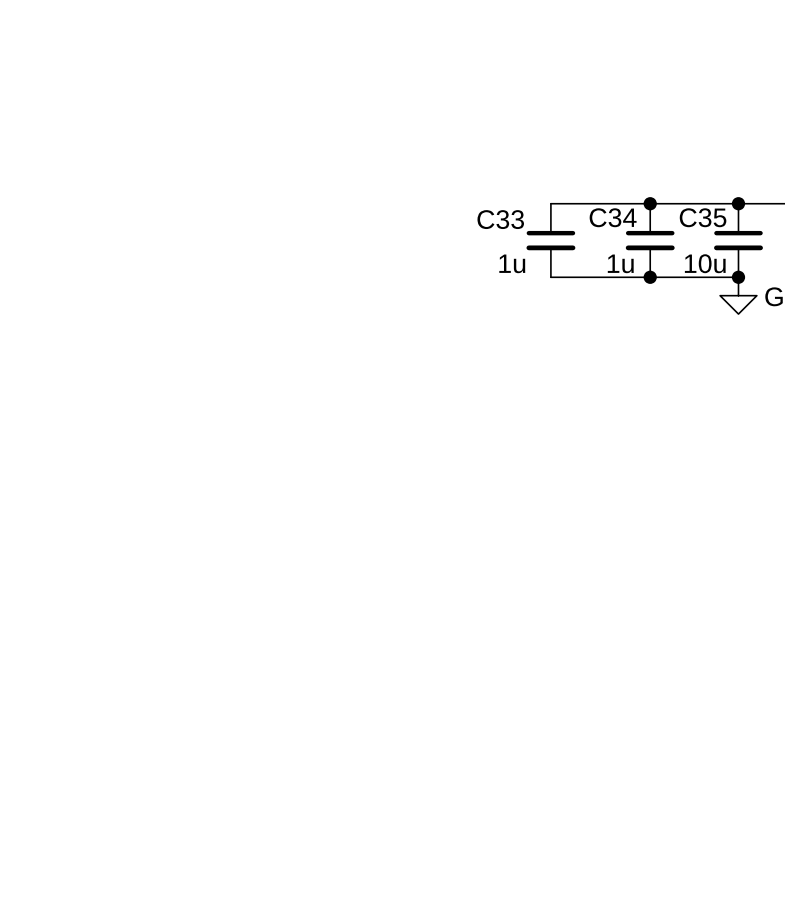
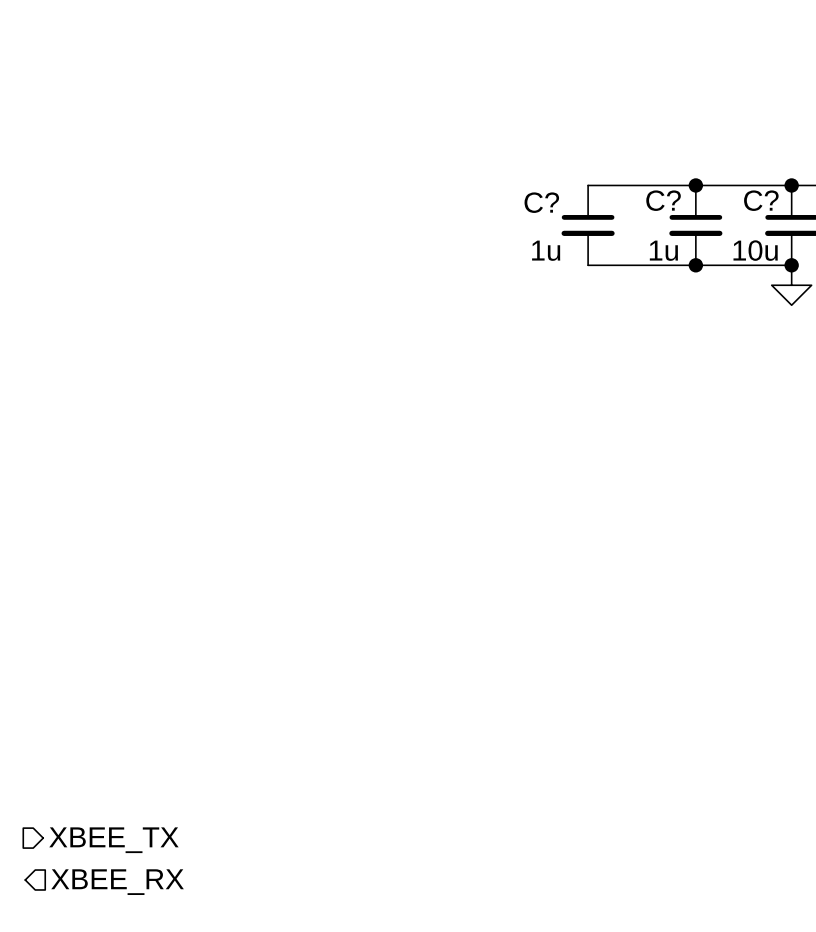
C34 name: C34 (613, 217) -> C? (663, 200)
C35 name: C35 (703, 217) -> C? (761, 200)
C33 name: C33 (500, 219) -> C? (541, 202)
hierarchical label: none -> XBEE_TX (113, 840)
hierarchical label: none -> XBEE_RX (117, 882)

